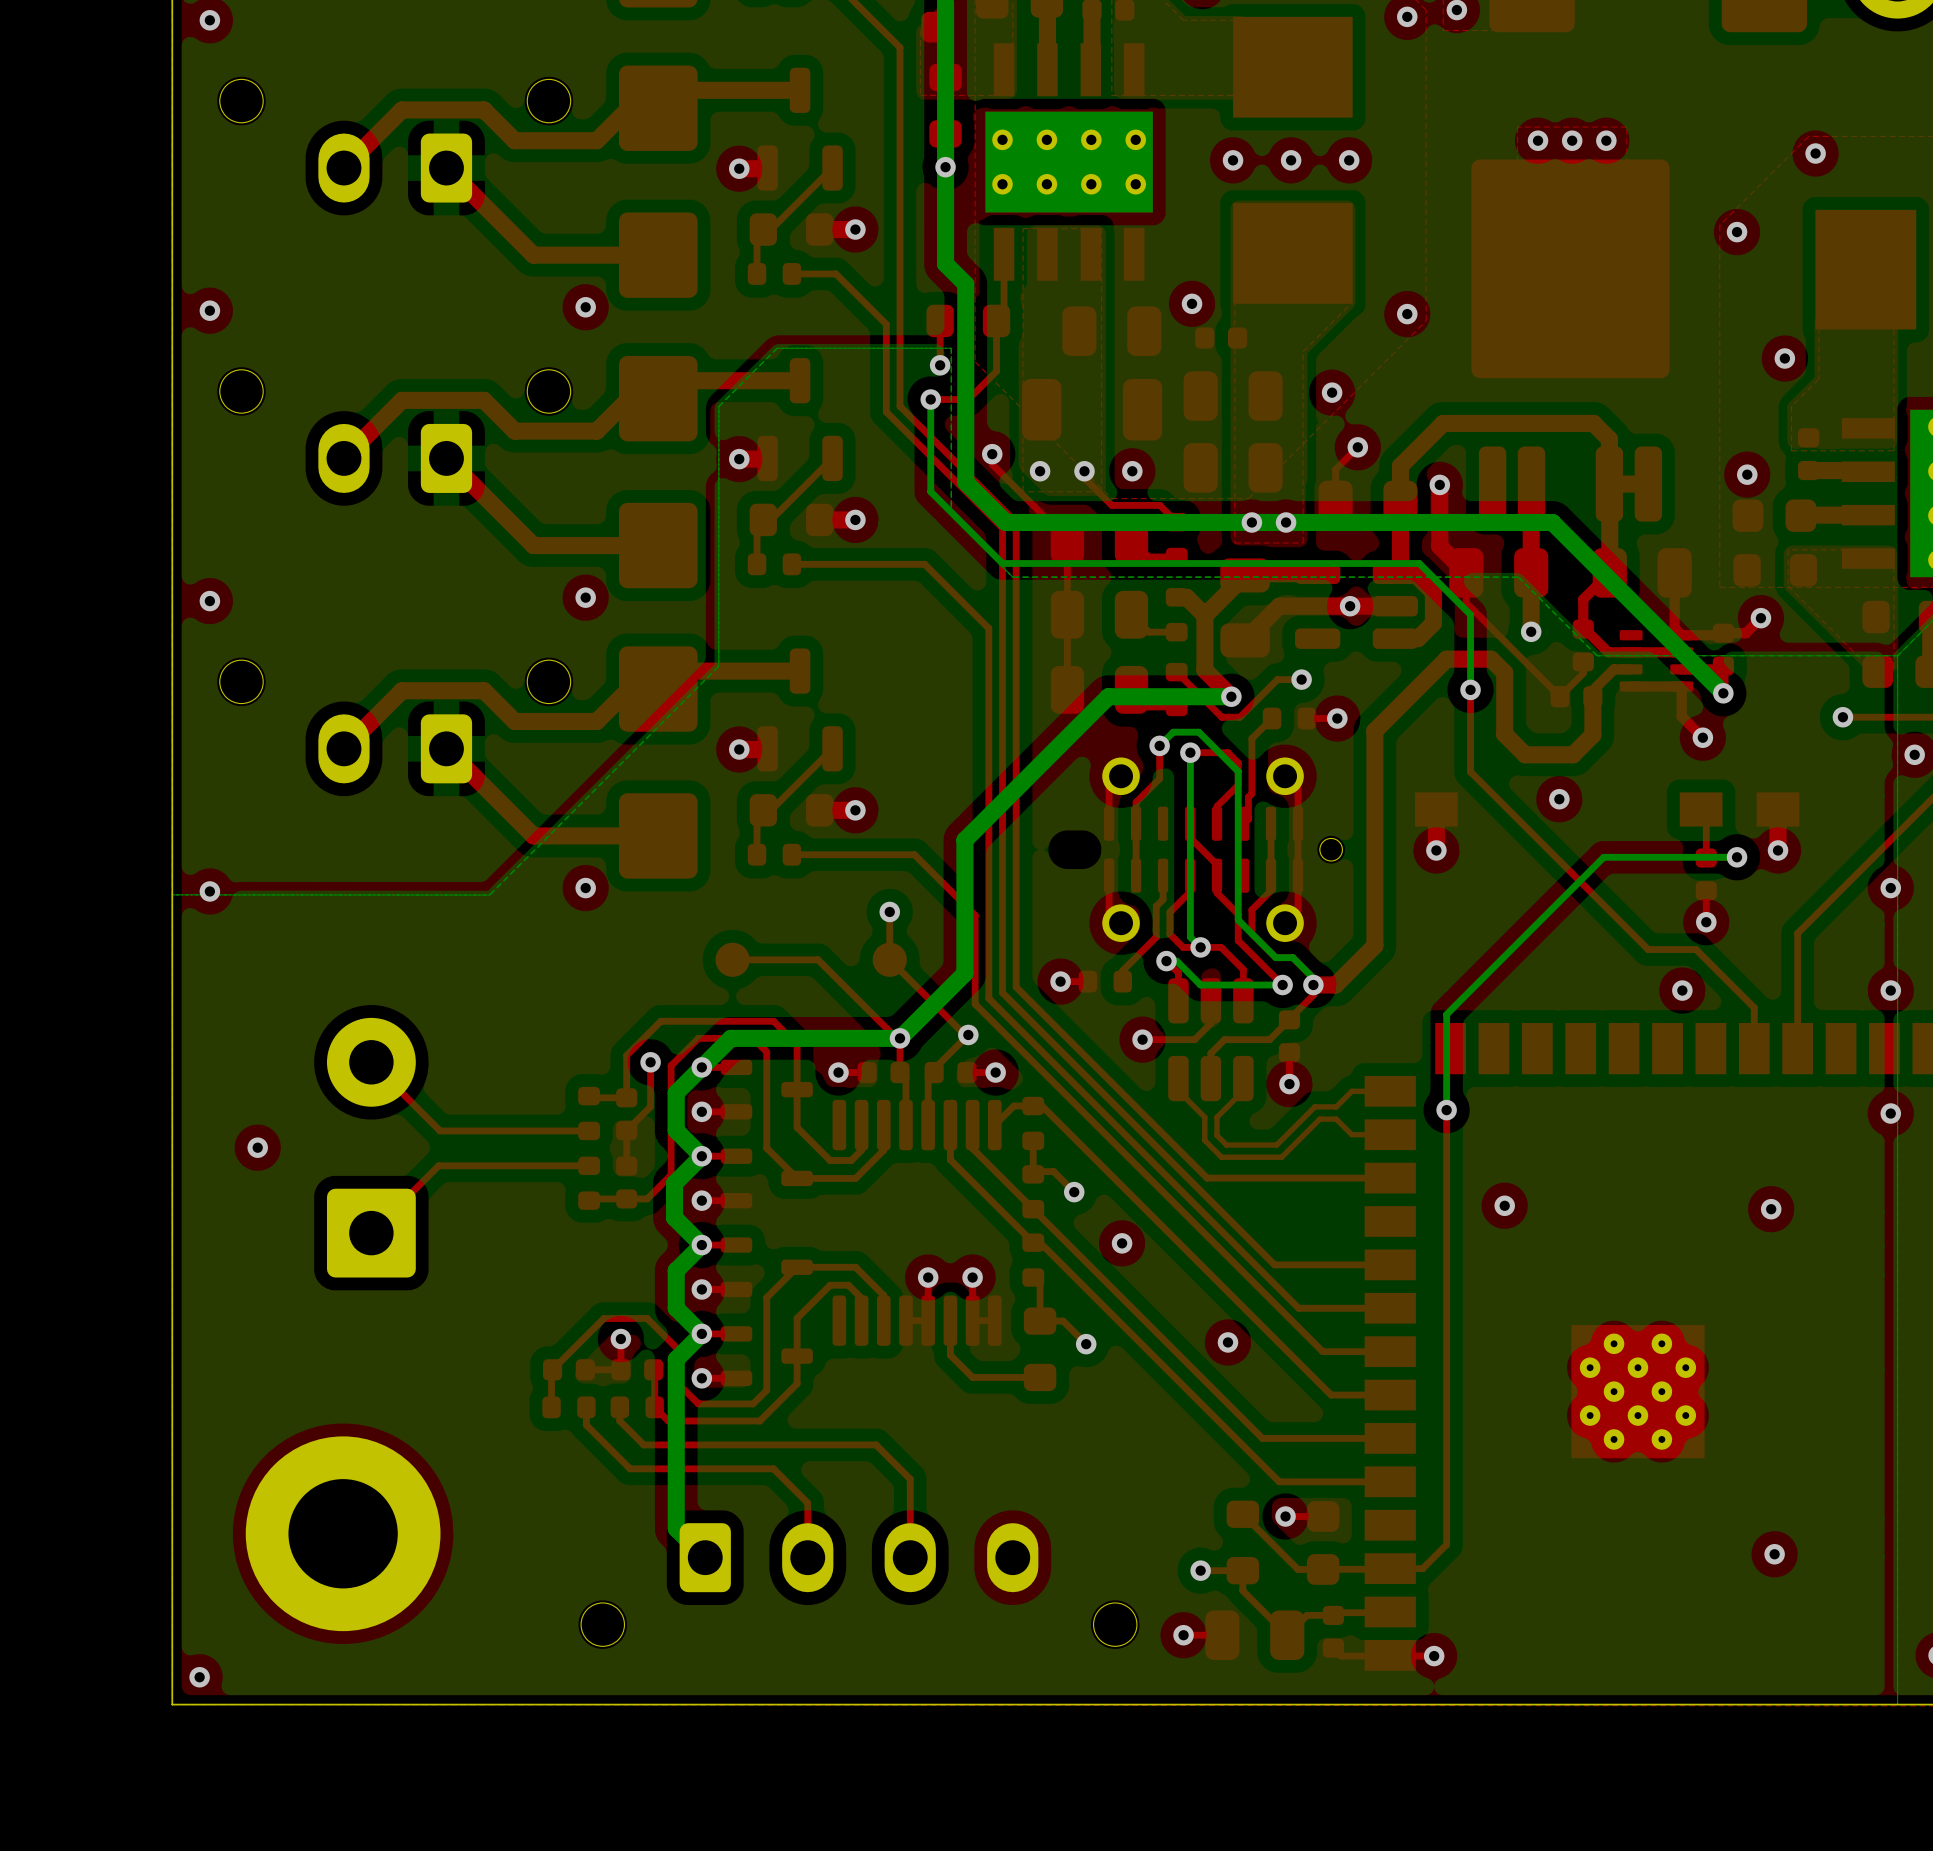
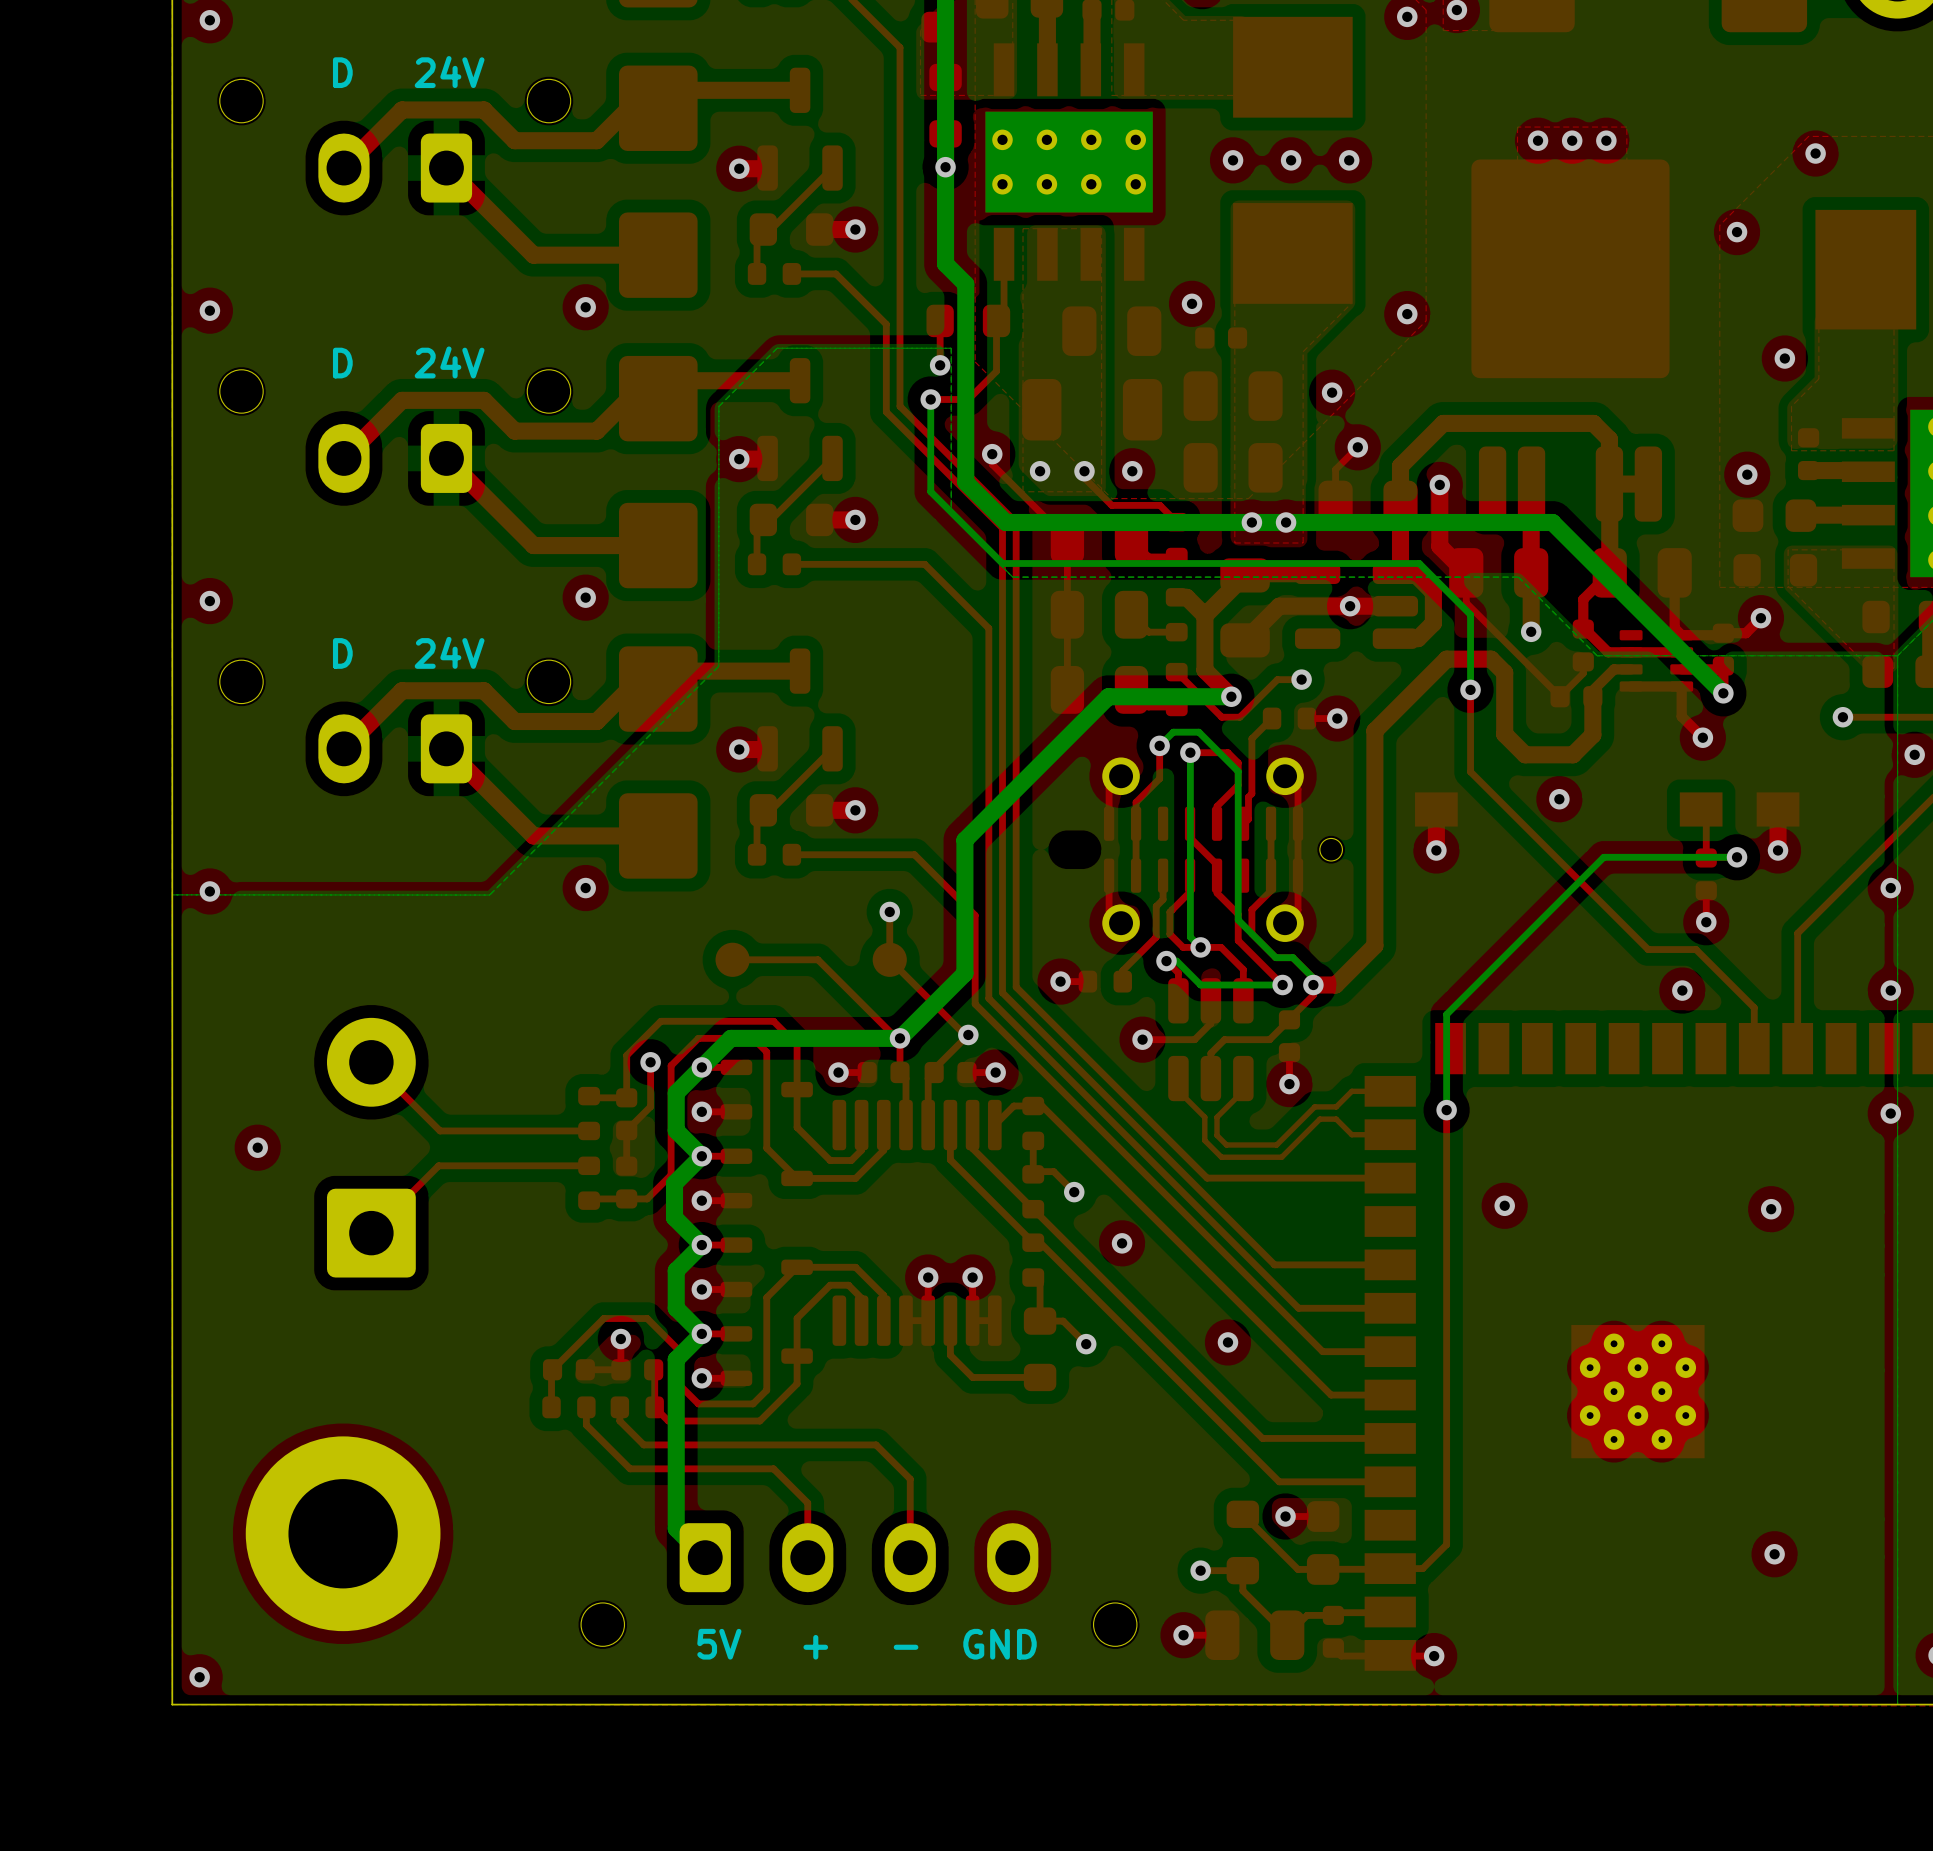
text: none -> D 24V (408, 72)
text: none -> D 24V (408, 362)
text: none -> D 24V (408, 652)
text: none -> 5V + - GND (867, 1644)

